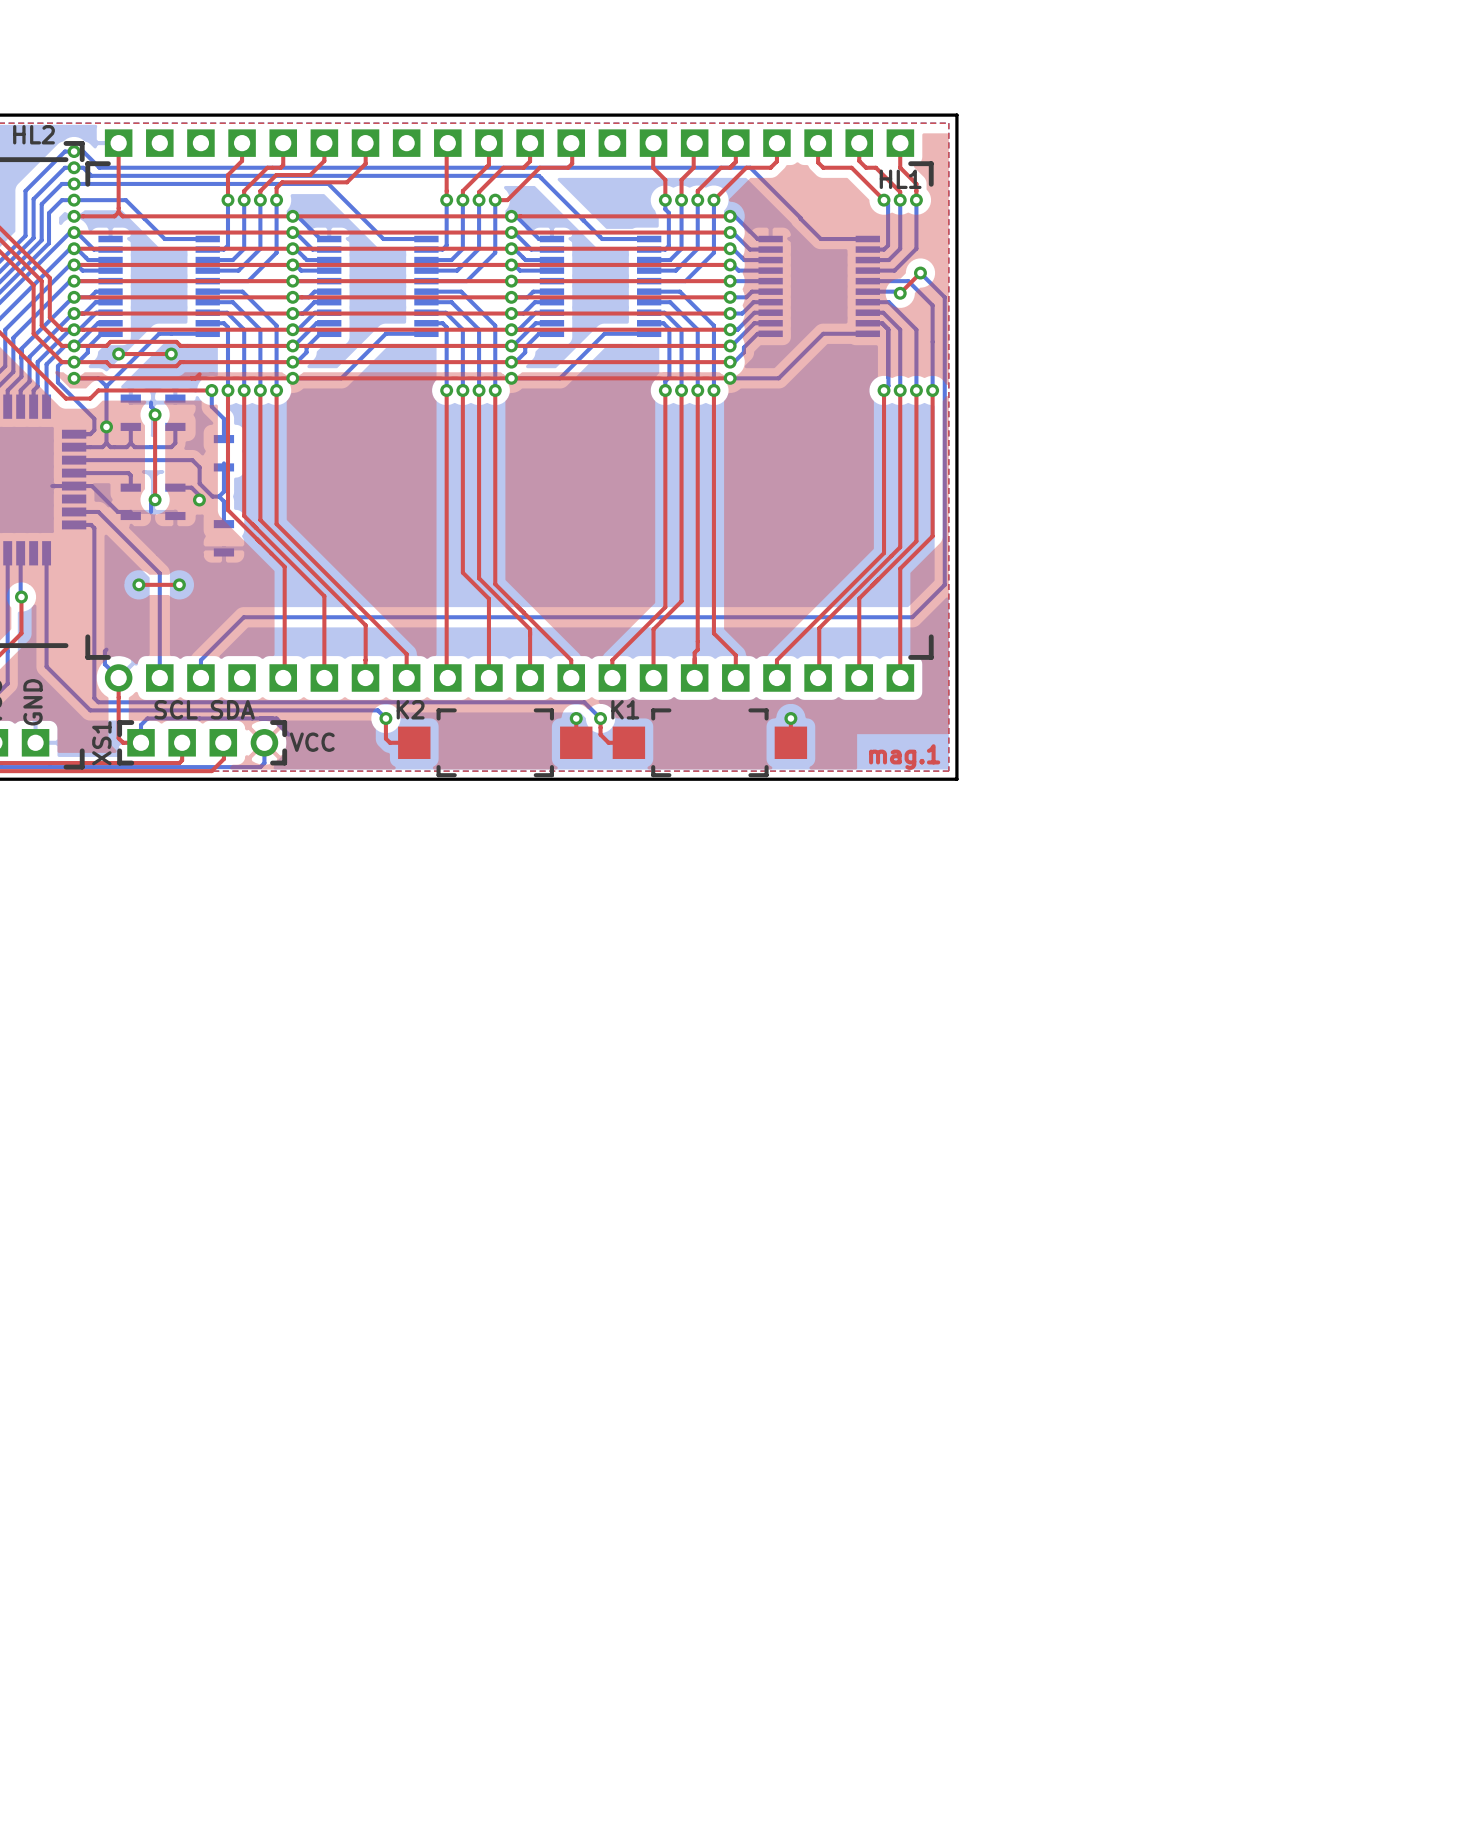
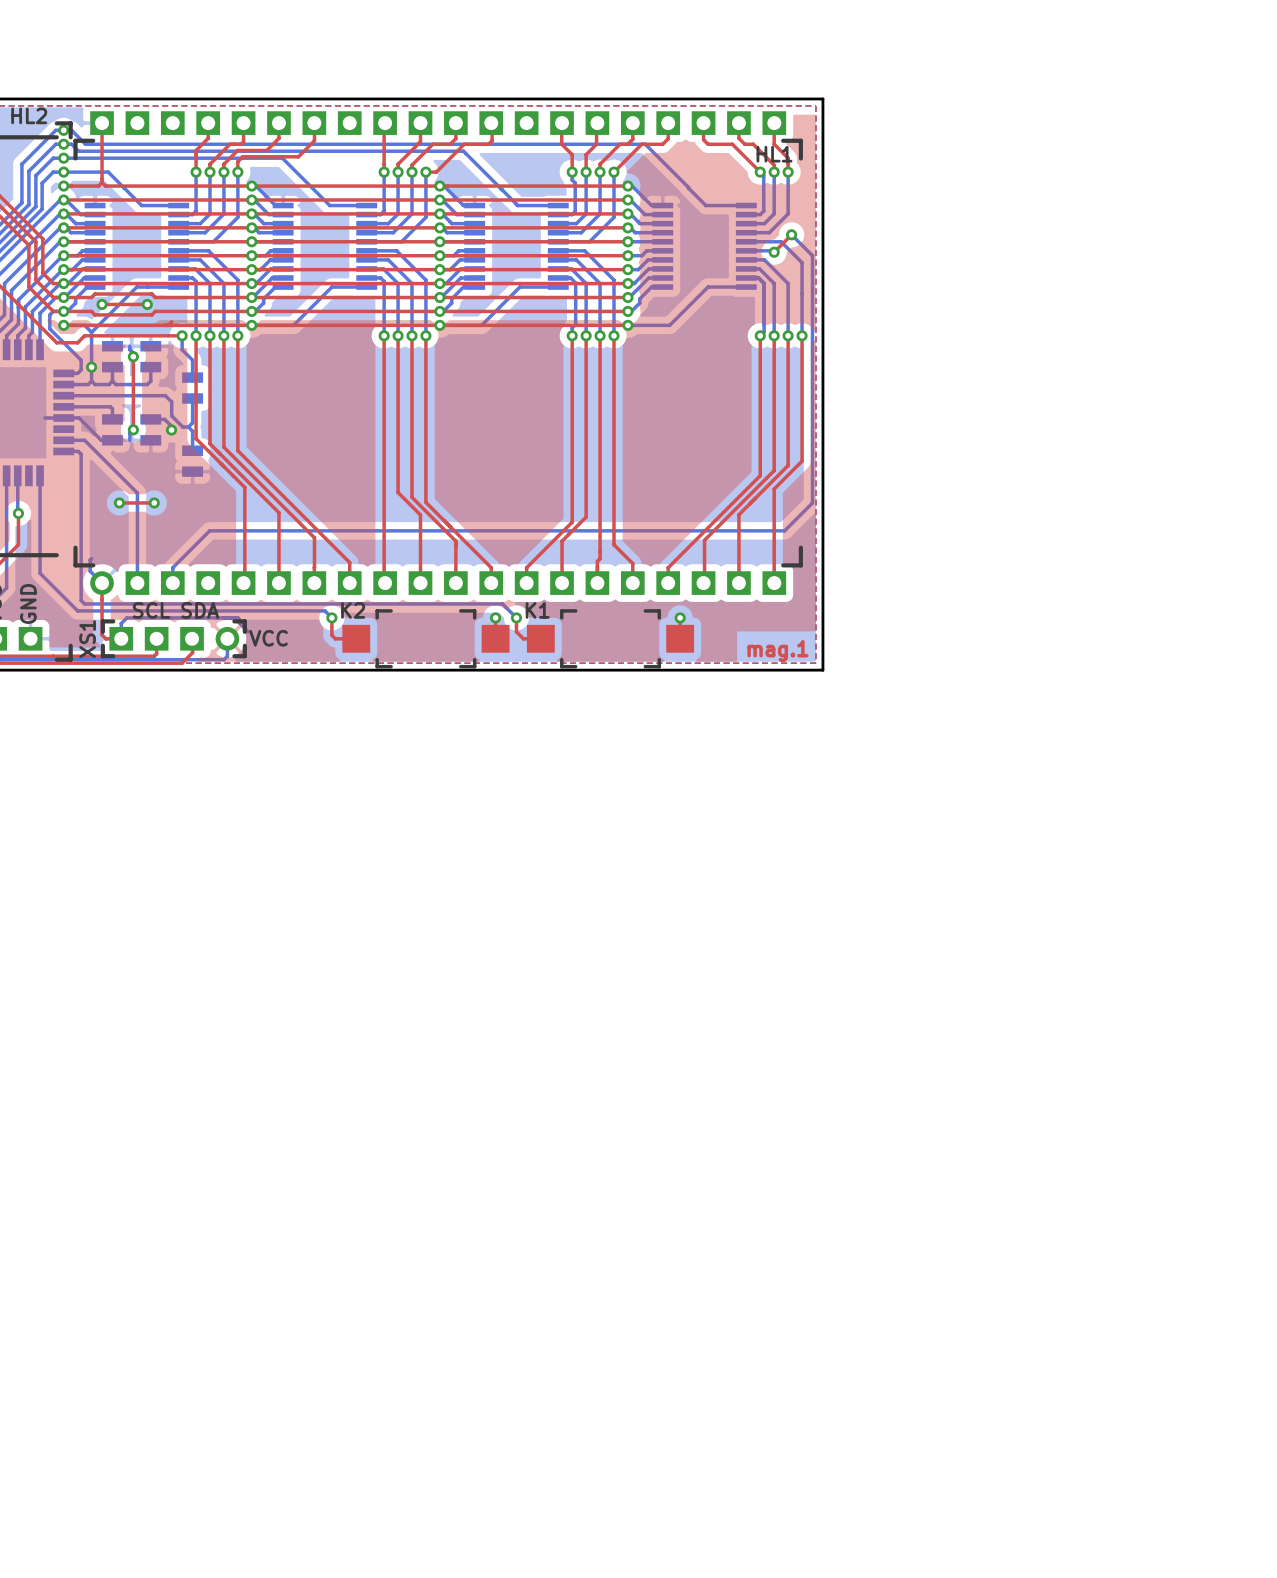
part footprint: [120, 394, 141, 431] -> [102, 341, 123, 373]
part footprint: [165, 394, 186, 431] -> [140, 341, 162, 373]
part footprint: [213, 435, 235, 472] -> [182, 372, 204, 404]
part footprint: [120, 483, 141, 521] -> [102, 414, 123, 446]
part footprint: [165, 483, 186, 521] -> [140, 414, 162, 446]
part footprint: [213, 520, 235, 557] -> [182, 445, 204, 477]

